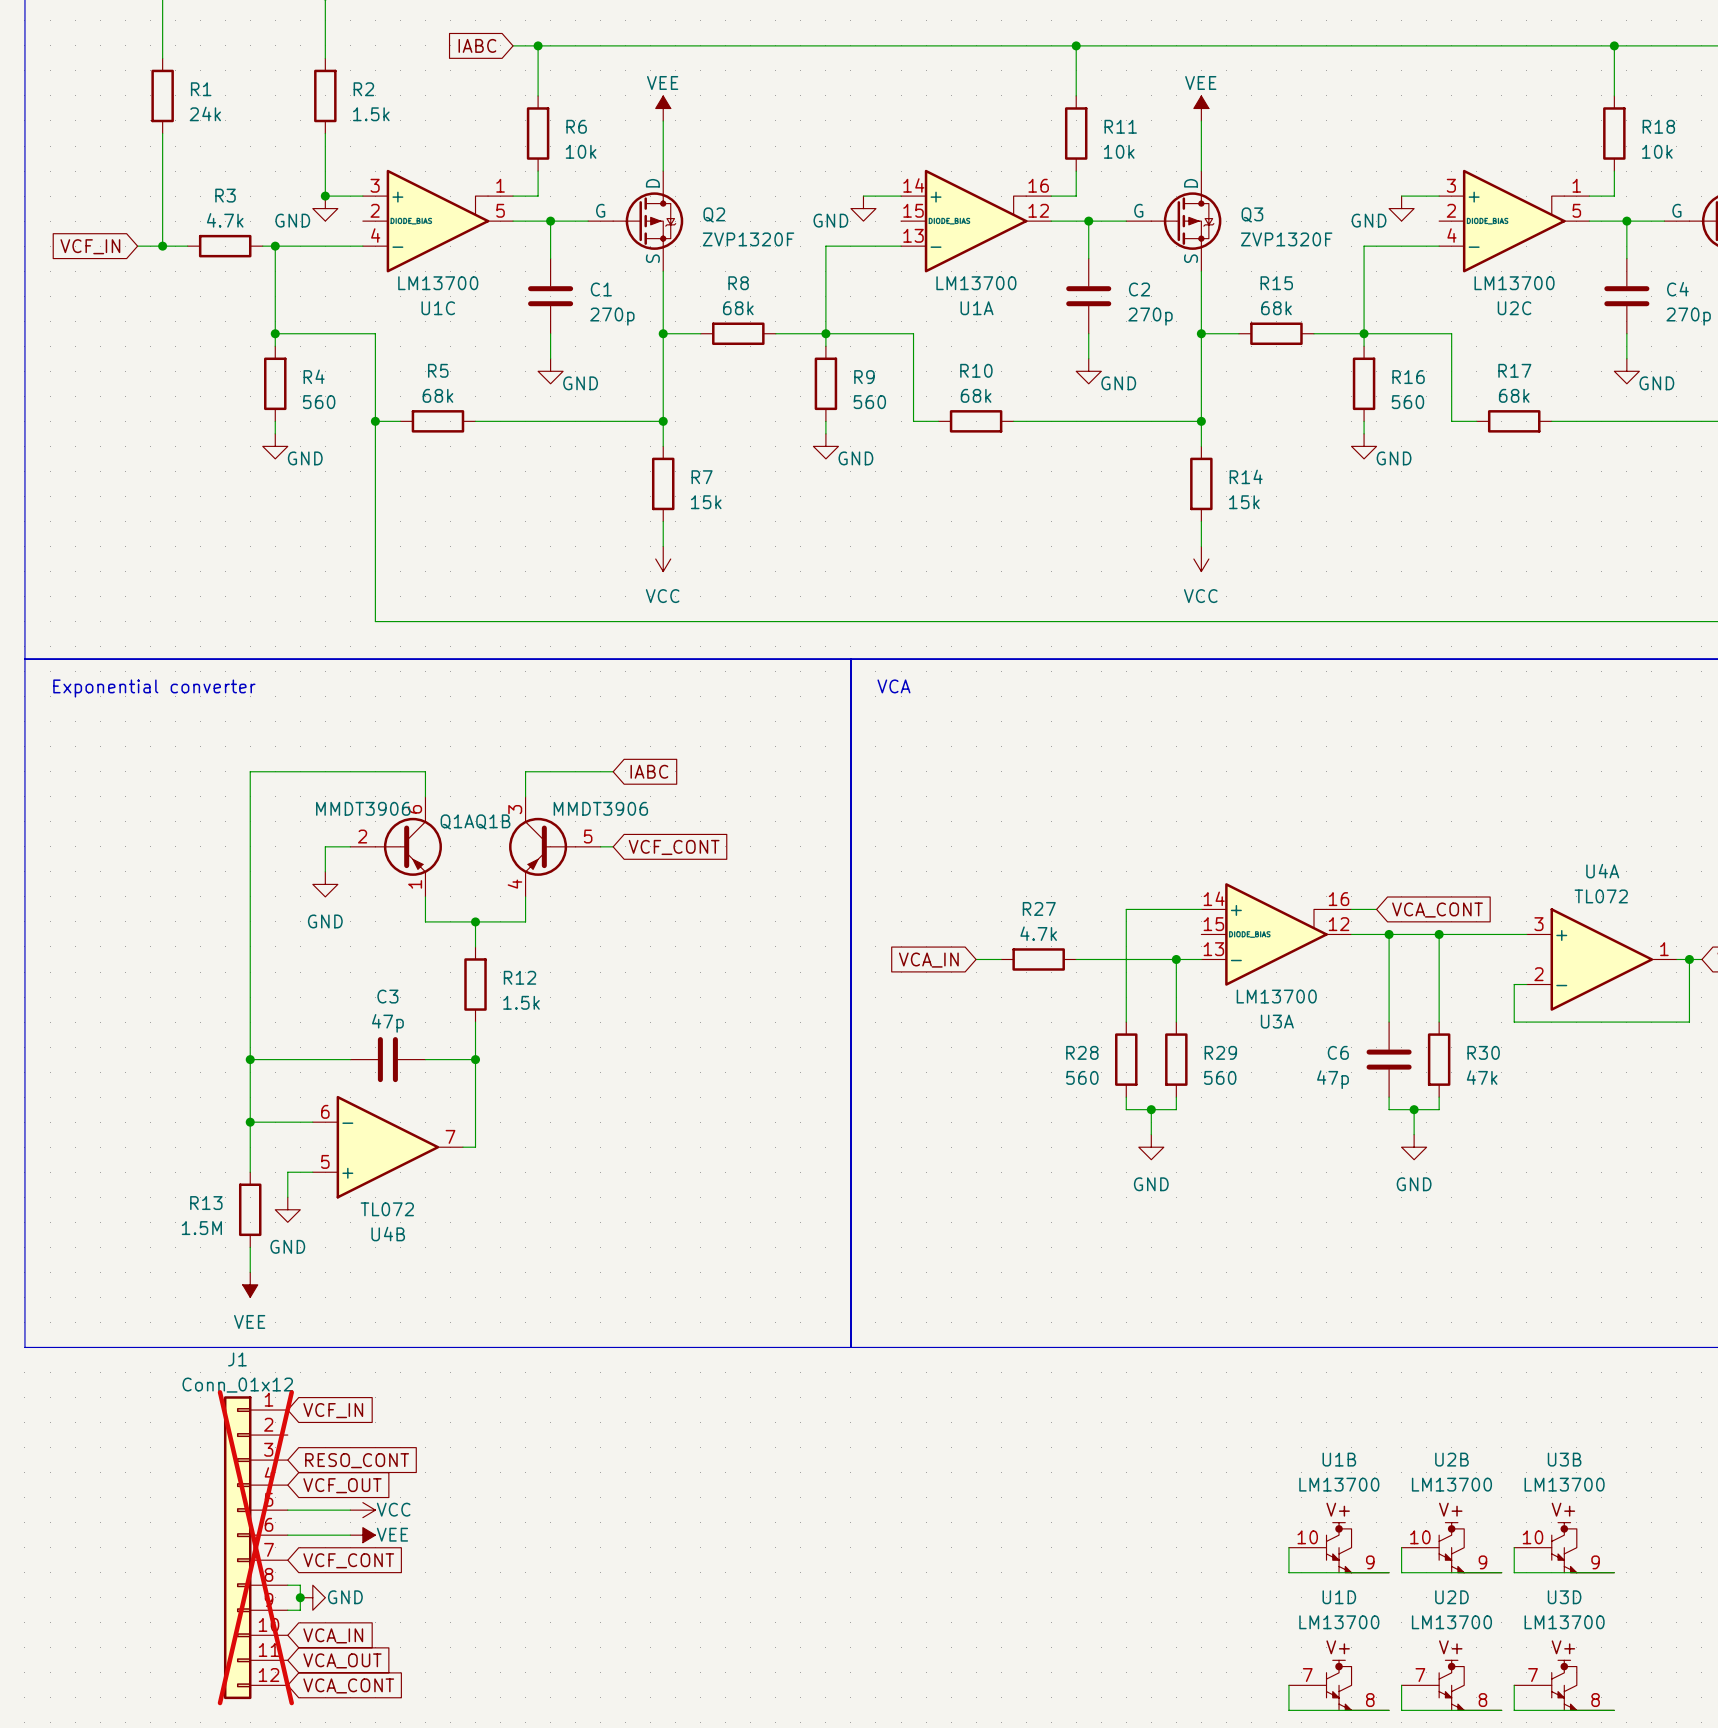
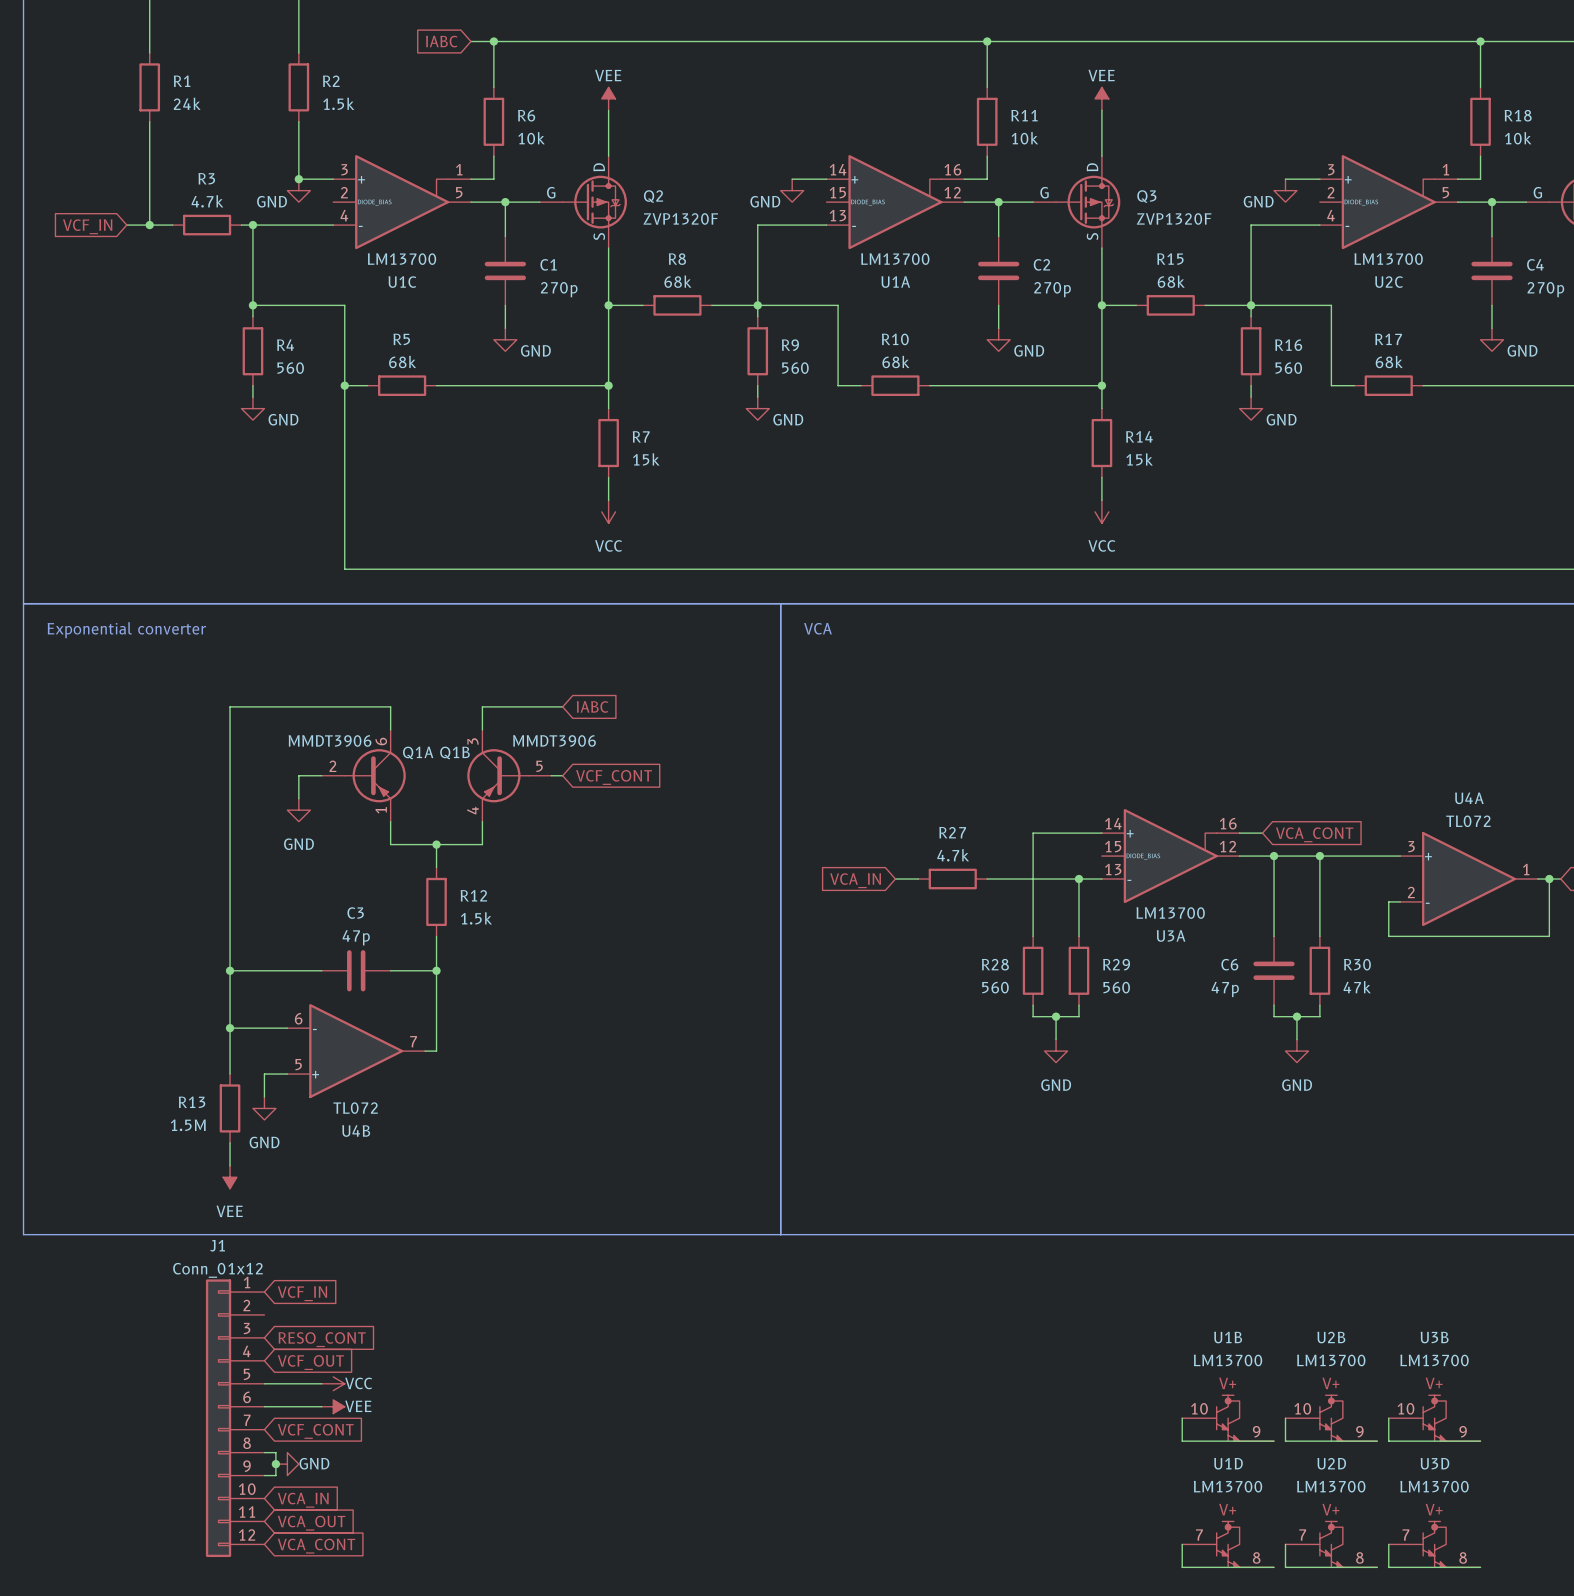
J1 do-not-place cross: (255, 1547) -> none

